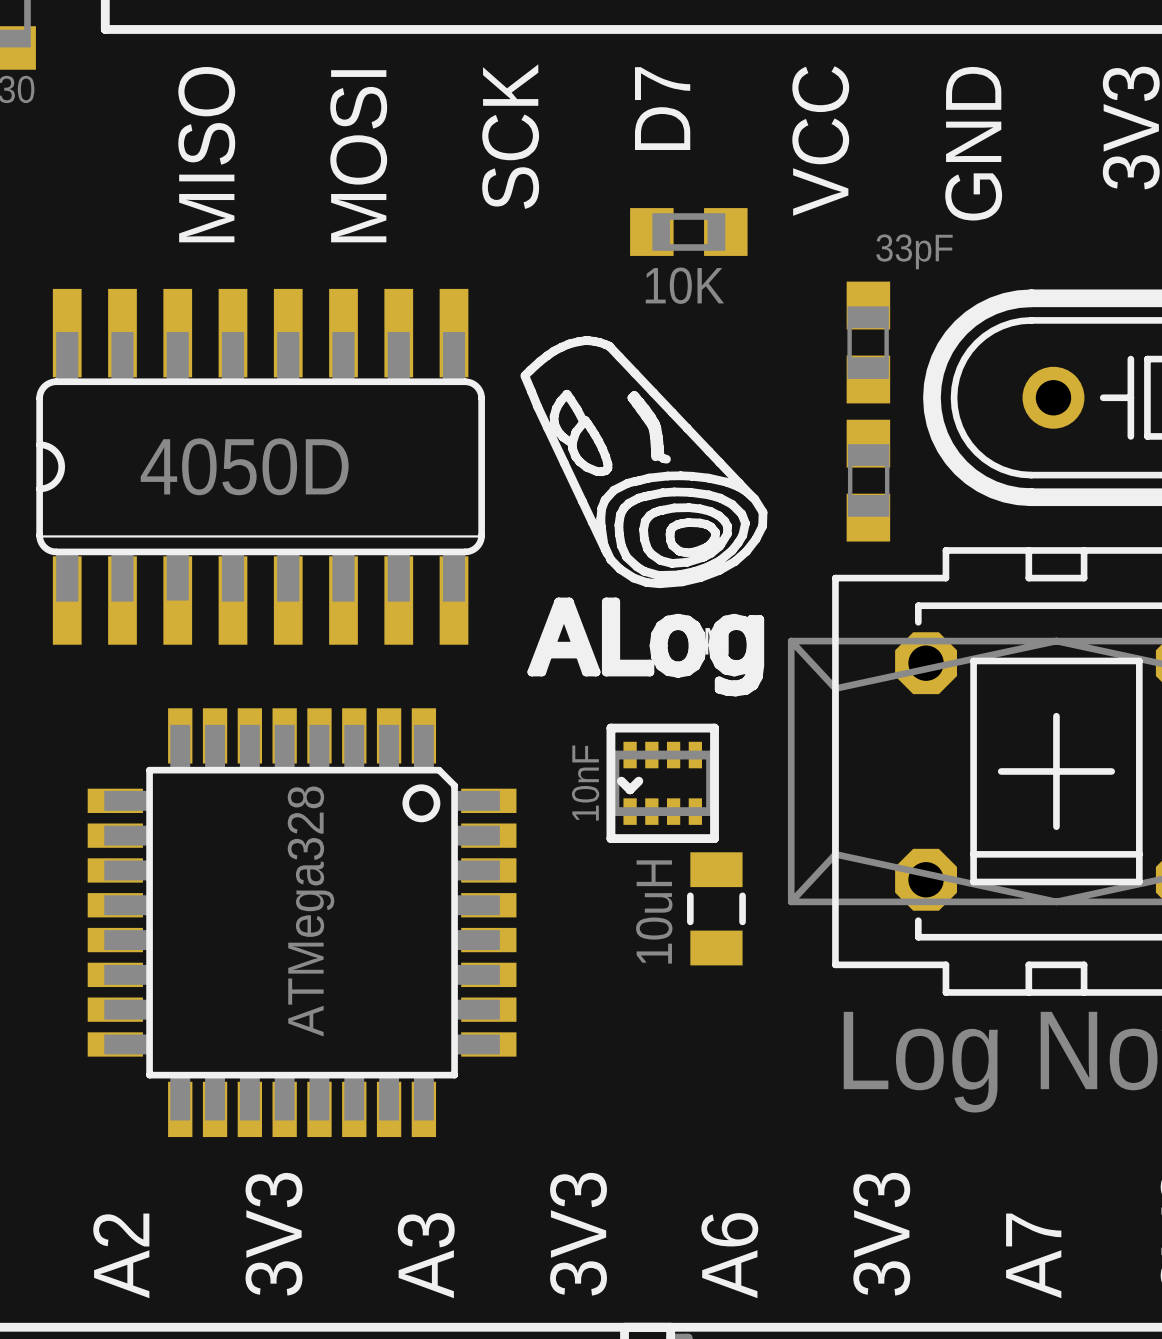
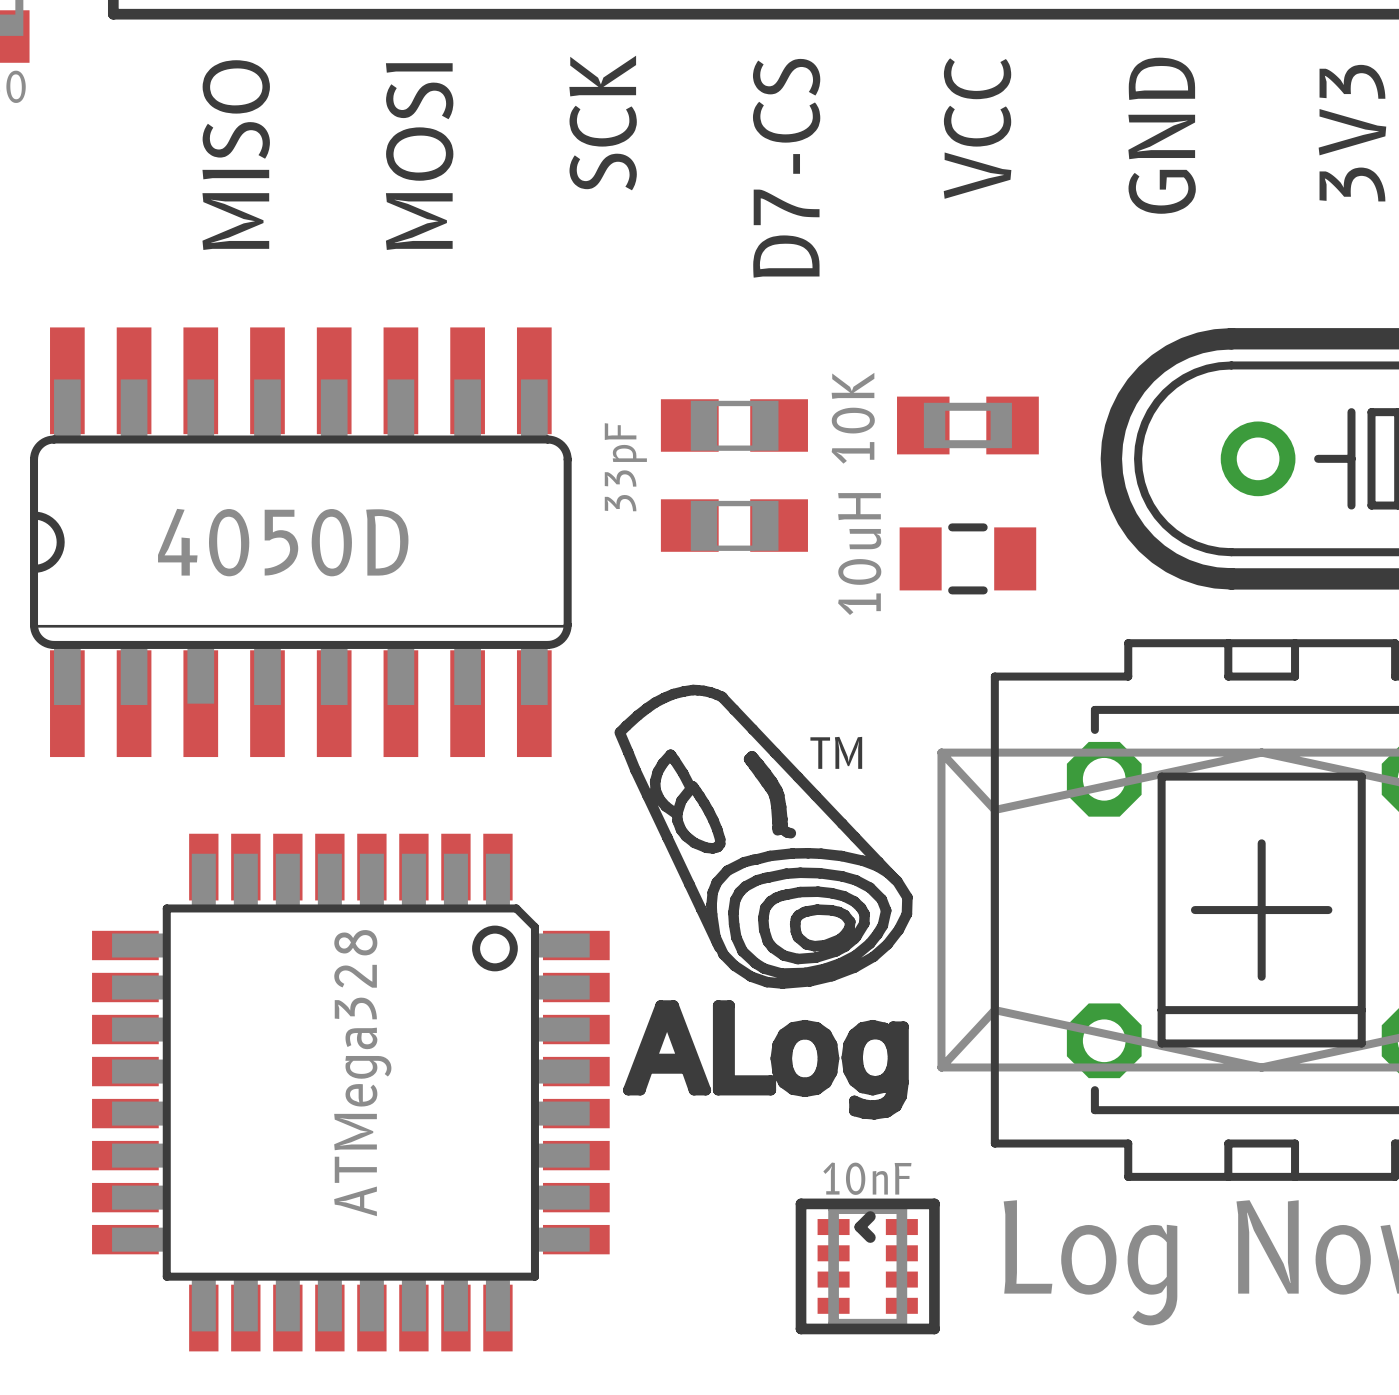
text: D7 (662, 108) -> D7-CS (786, 168)
part position: (688, 232) -> (967, 425)
part value position: 33pF (914, 251) -> 33pF (625, 467)
part value rotation: 0° (684, 285) -> 90° counterclockwise (853, 418)
part rotation: 0° (868, 342) -> 90° clockwise (734, 525)
part position: (868, 342) -> (734, 525)
part rotation: 0° (868, 480) -> 90° clockwise (734, 425)
part position: (868, 480) -> (734, 425)
drawing position: (643, 516) -> (763, 902)
part rotation: 0° (662, 783) -> 90° clockwise (867, 1266)
part position: (662, 783) -> (867, 1266)
part rotation: 0° (716, 908) -> 90° clockwise (967, 558)
part position: (716, 908) -> (967, 558)

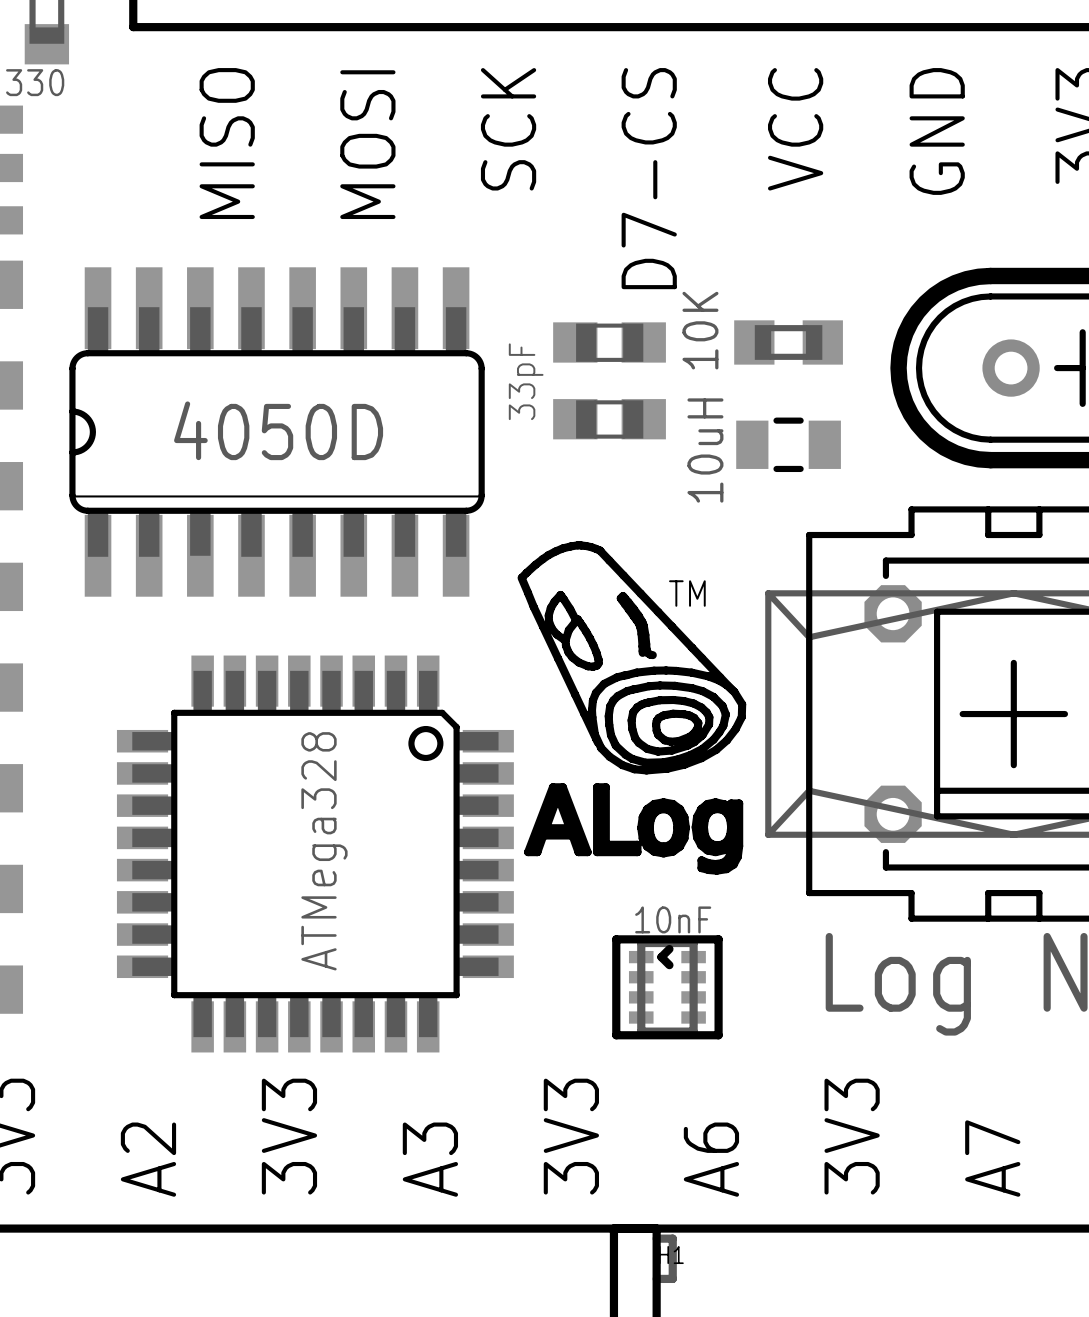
part position: (867, 1266) -> (667, 987)

